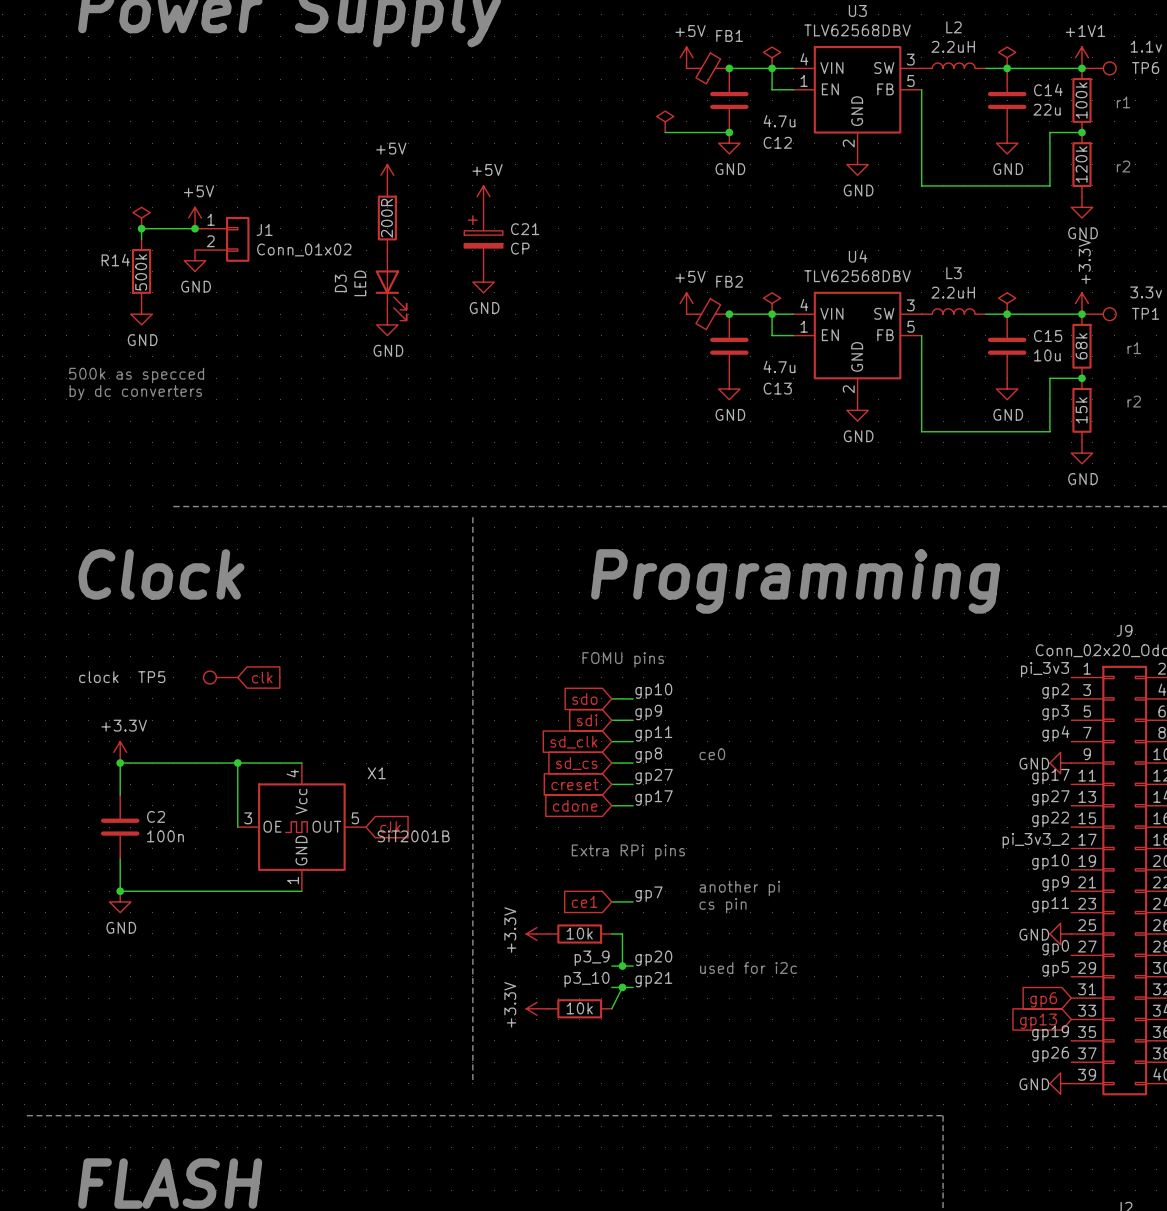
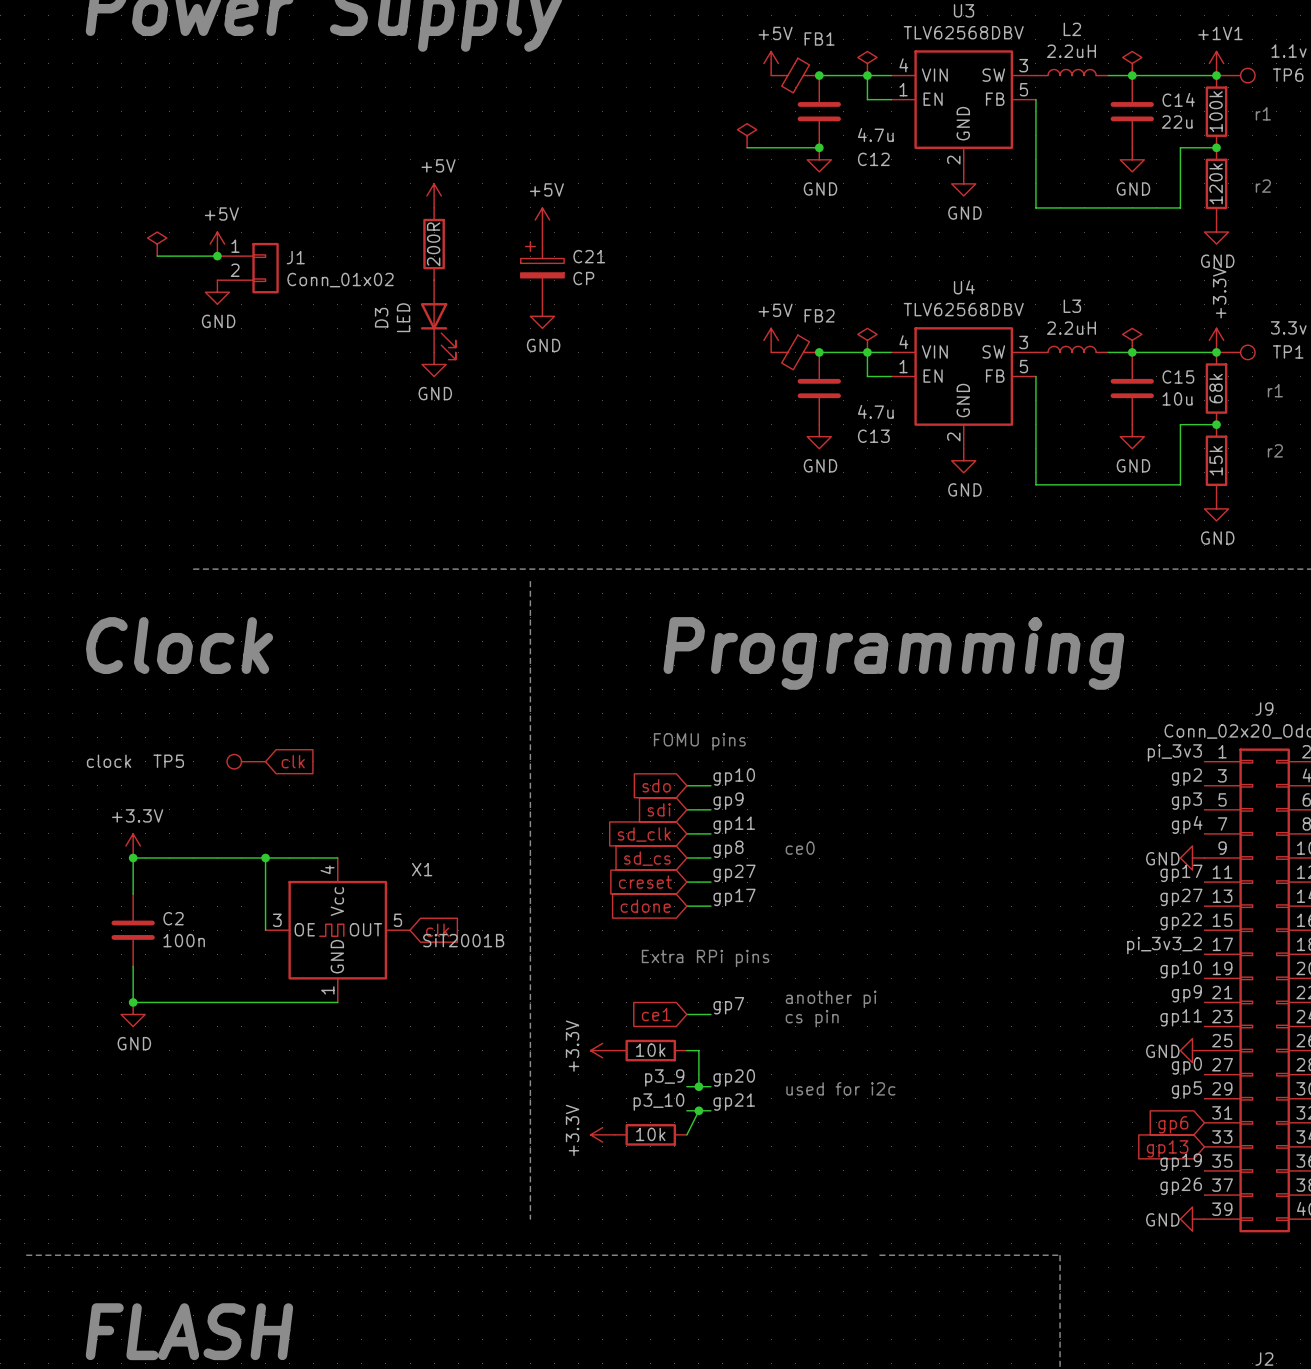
wire: (141, 228) (141, 239) -> none
junction: (141, 228) -> none
R14: 500k (141, 271) -> none
power symbol: GND (141, 314) -> none
text: 500k as specced (136, 375) -> none
text: by dc converters (135, 392) -> none

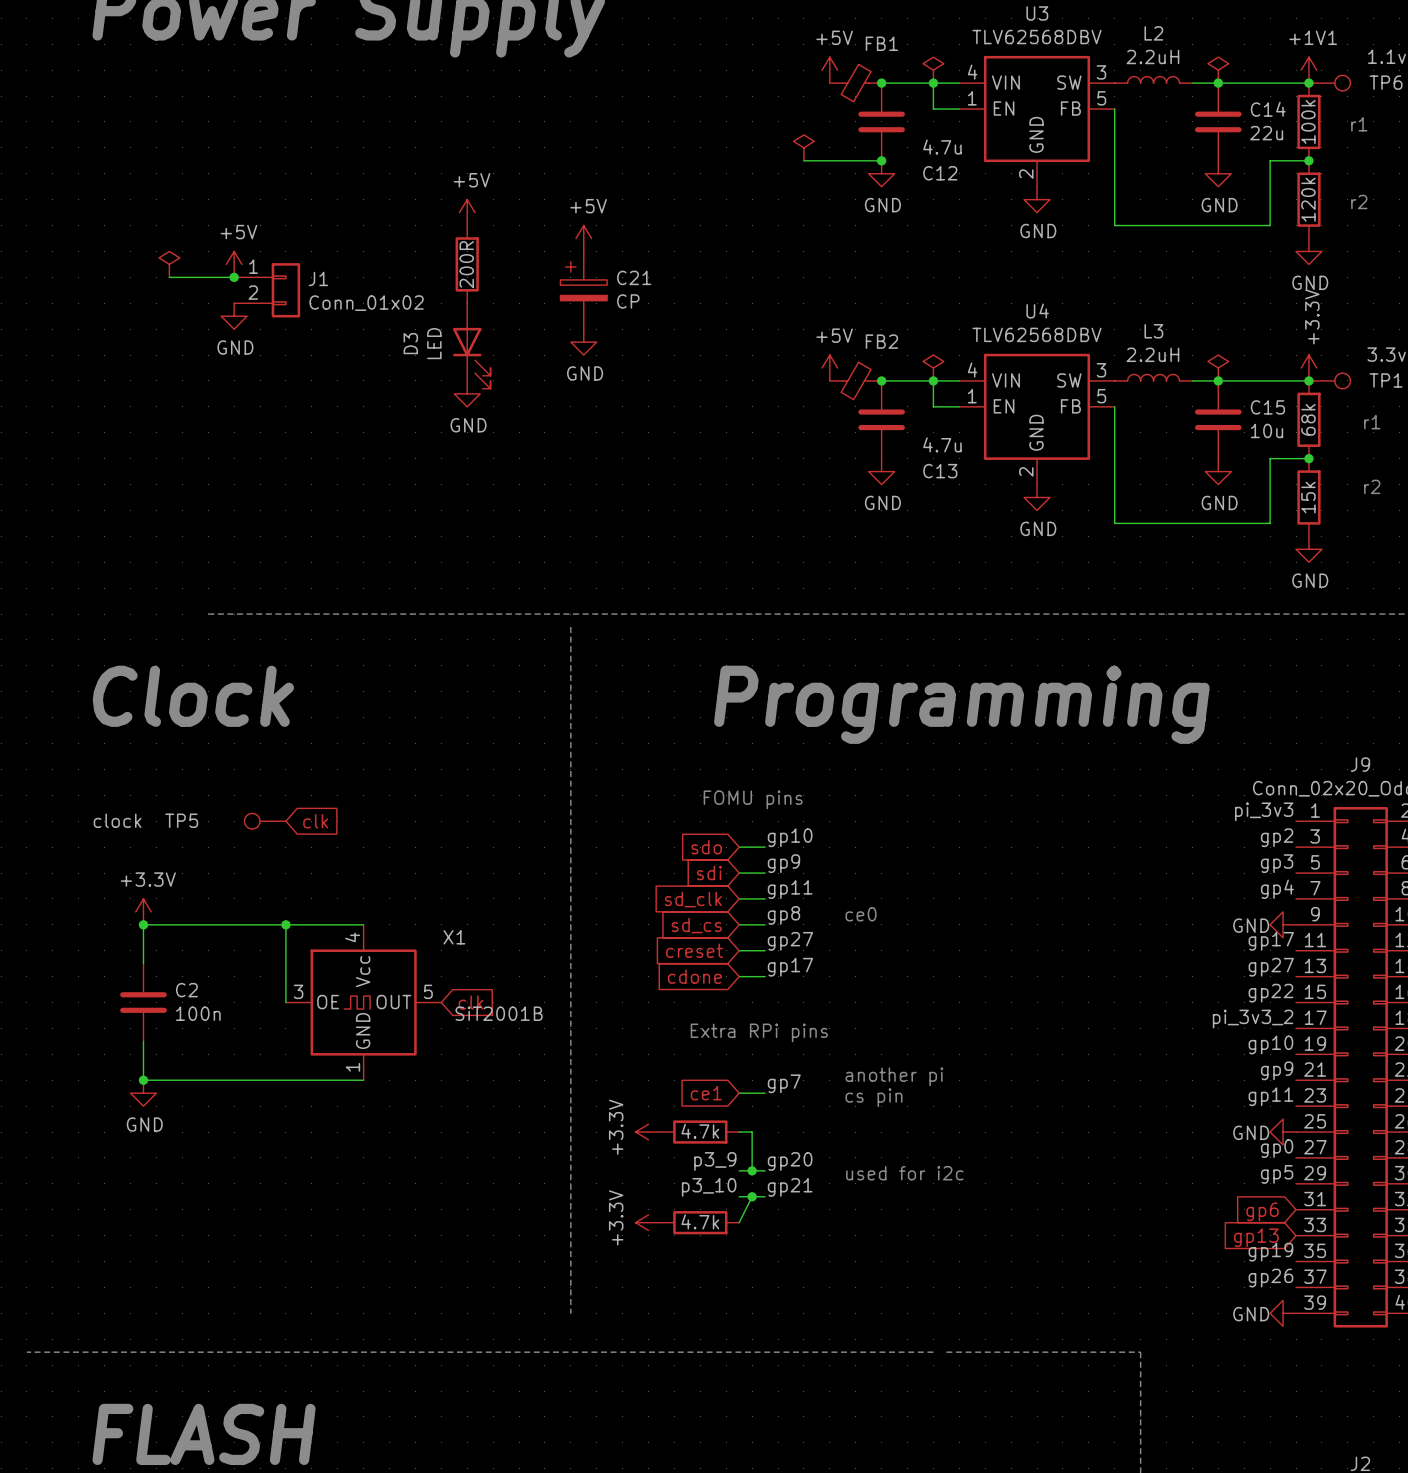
part value: 10k (650, 1050) -> 4.7k (700, 1131)
part value: 10k (650, 1134) -> 4.7k (700, 1221)

